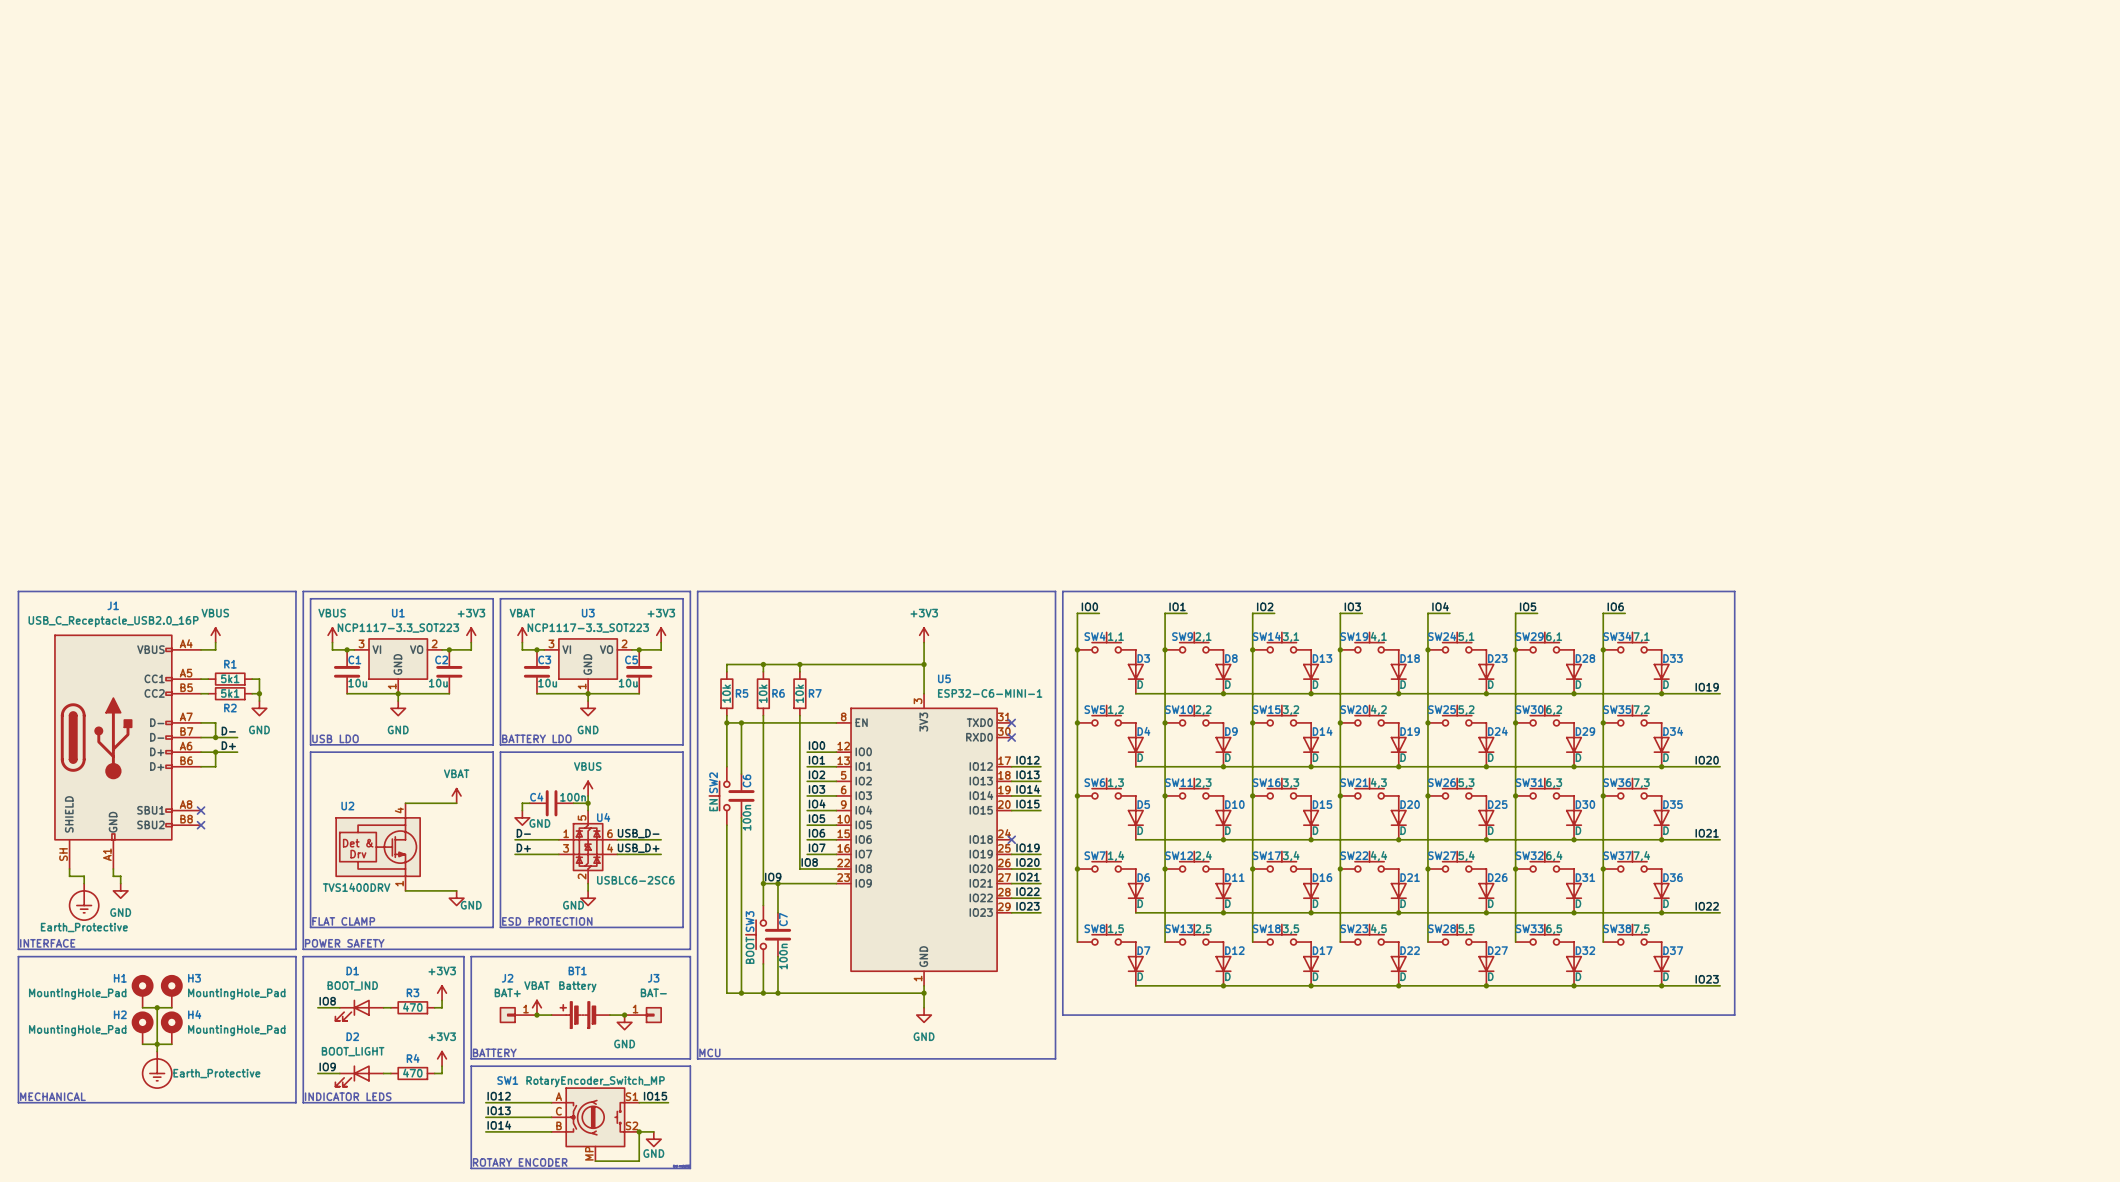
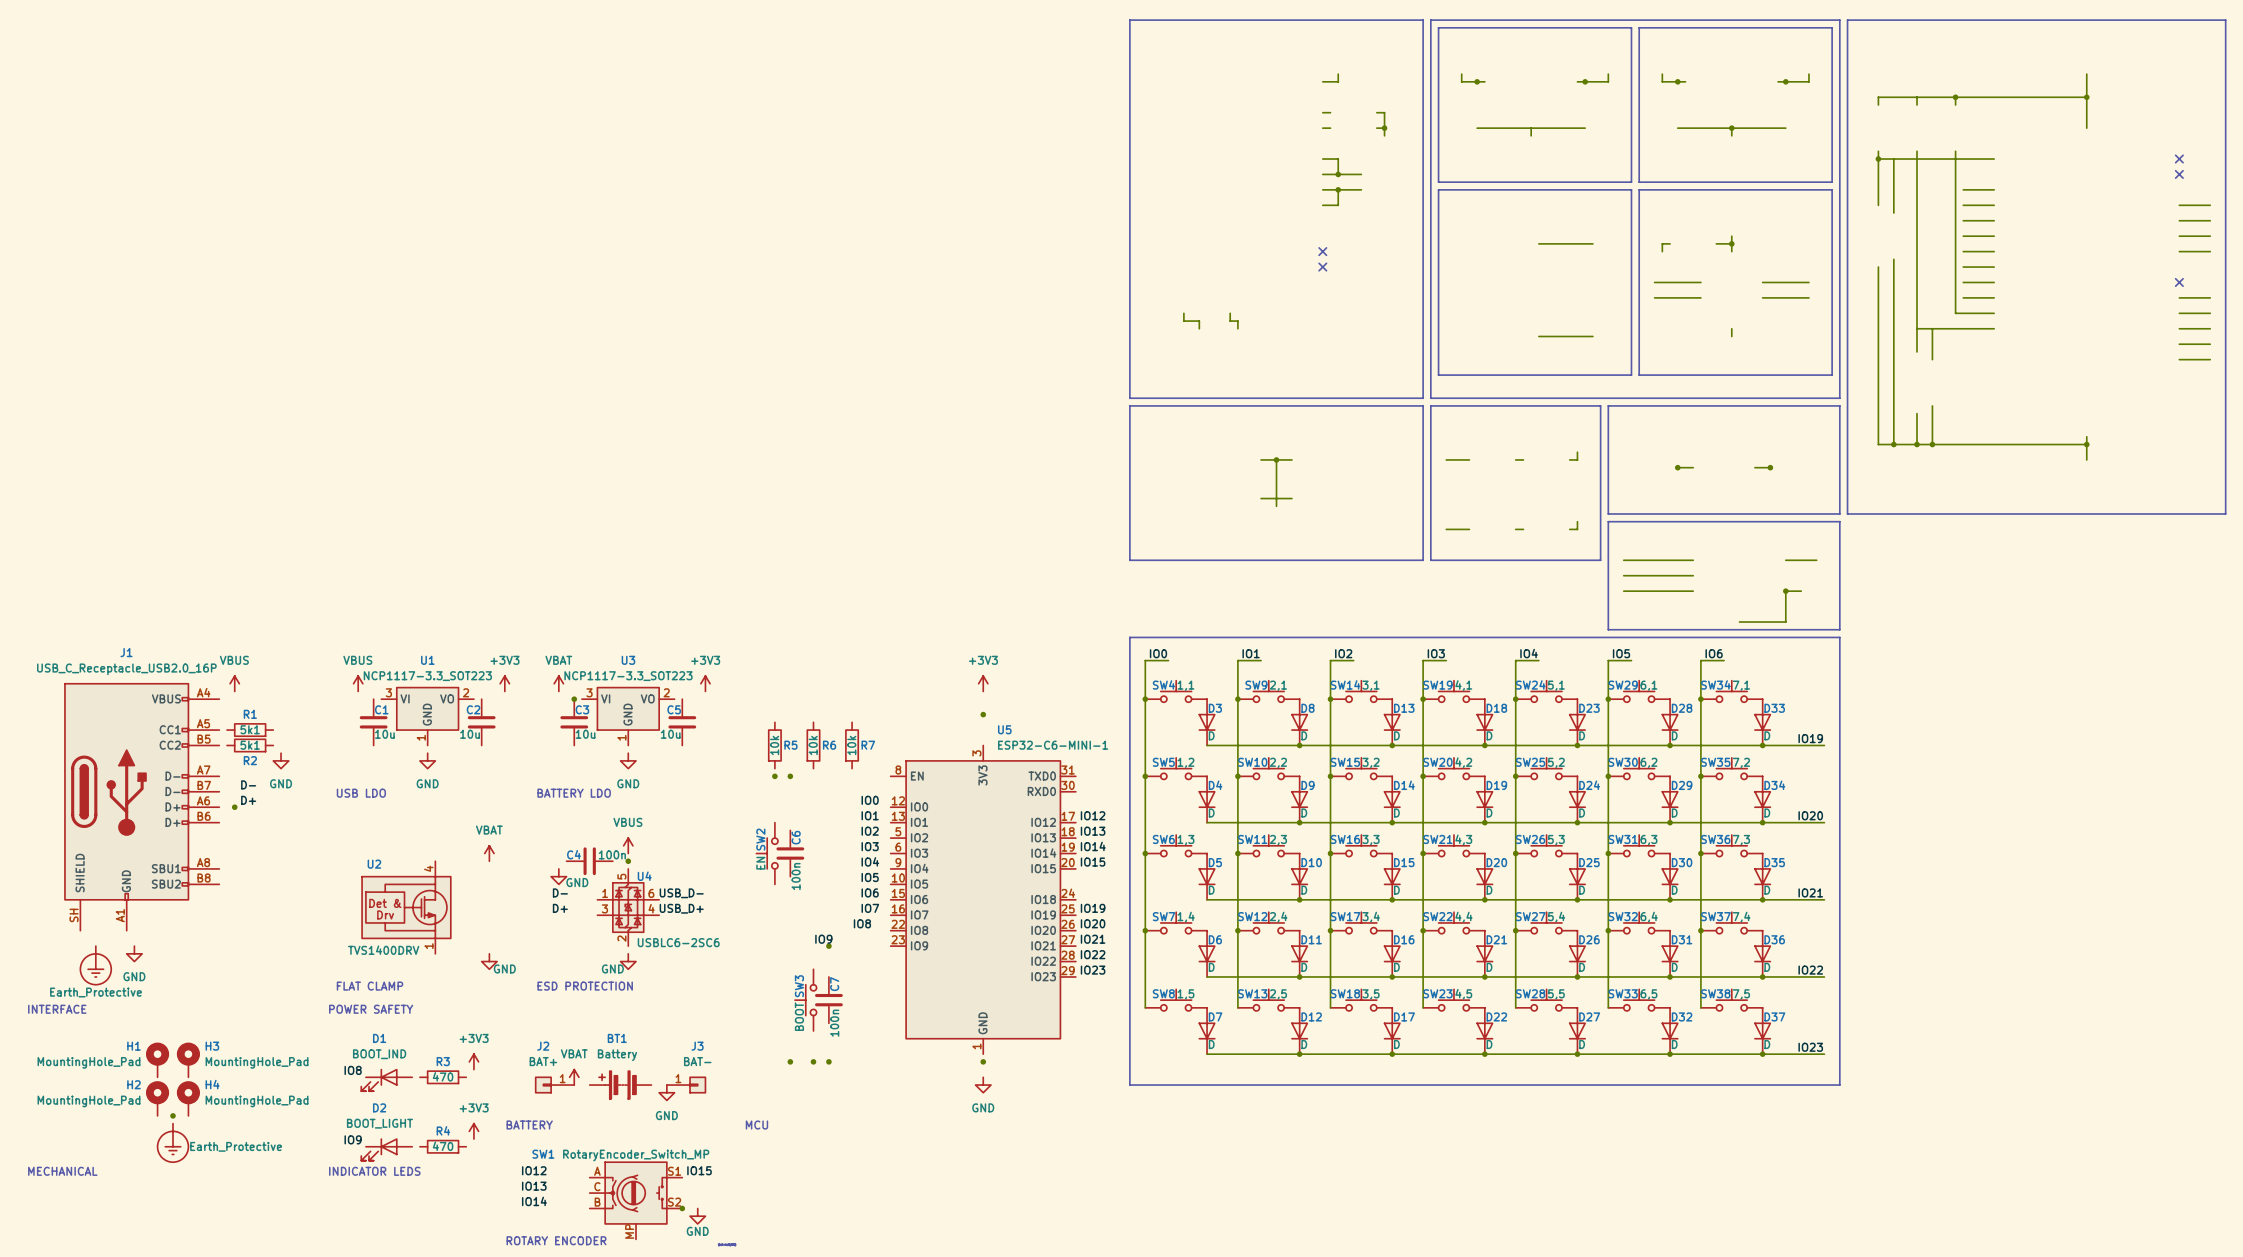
line: none -> (1129, 20) (1129, 398) (1423, 398) (1423, 20) (1129, 20)
line: none -> (1430, 20) (1430, 398) (1839, 398) (1839, 20) (1430, 20)
line: none -> (1847, 20) (2225, 20) (2225, 513) (1847, 513) (1847, 20)
line: none -> (1438, 27) (1631, 27) (1631, 182) (1438, 182) (1438, 27)
line: none -> (1639, 27) (1832, 27) (1832, 182) (1639, 182) (1639, 27)
wire: none -> (1338, 74) (1338, 81) (1322, 81)
wire: none -> (1461, 74) (1461, 81) (1484, 81)
wire: none -> (1608, 74) (1608, 81) (1577, 81)
wire: none -> (1662, 74) (1662, 81) (1685, 81)
wire: none -> (1808, 74) (1808, 81) (1778, 81)
wire: none -> (2086, 74) (2086, 128)
junction: none -> (1477, 81)
junction: none -> (1585, 81)
junction: none -> (1677, 81)
junction: none -> (1785, 81)
wire: none -> (1916, 97) (1916, 104)
wire: none -> (1955, 97) (1955, 104)
junction: none -> (1955, 97)
wire: none -> (2086, 97) (1878, 97) (1878, 104)
junction: none -> (2086, 97)
wire: none -> (1322, 112) (1330, 112)
wire: none -> (1376, 112) (1384, 112) (1384, 135)
wire: none -> (1322, 128) (1330, 128)
wire: none -> (1376, 128) (1384, 128)
junction: none -> (1384, 128)
wire: none -> (1477, 128) (1585, 128)
wire: none -> (1531, 128) (1531, 135)
wire: none -> (1677, 128) (1785, 128)
wire: none -> (1731, 128) (1731, 135)
junction: none -> (1731, 128)
wire: none -> (1878, 151) (1878, 205)
wire: none -> (1916, 151) (1916, 351)
wire: none -> (1955, 151) (1955, 313) (1994, 313)
wire: none -> (1322, 159) (1338, 159) (1338, 174)
wire: none -> (1878, 159) (1994, 159)
junction: none -> (1878, 159)
wire: none -> (1893, 159) (1893, 213)
no-connect mark: none -> (2179, 159)
wire: none -> (1322, 174) (1361, 174)
junction: none -> (1338, 174)
no-connect mark: none -> (2179, 174)
wire: none -> (1322, 189) (1361, 189)
wire: none -> (1338, 189) (1338, 205) (1322, 205)
junction: none -> (1338, 189)
line: none -> (1438, 189) (1438, 375) (1631, 375) (1631, 189) (1438, 189)
line: none -> (1639, 189) (1832, 189) (1832, 375) (1639, 375) (1639, 189)
wire: none -> (1963, 189) (1994, 189)
wire: none -> (1963, 205) (1994, 205)
wire: none -> (2179, 205) (2210, 205)
wire: none -> (1963, 220) (1994, 220)
wire: none -> (2179, 220) (2210, 220)
wire: none -> (1731, 236) (1731, 251)
wire: none -> (1963, 236) (1994, 236)
wire: none -> (2179, 236) (2210, 236)
wire: none -> (1538, 243) (1592, 243)
wire: none -> (1670, 243) (1662, 243) (1662, 251)
wire: none -> (1716, 243) (1731, 243)
junction: none -> (1731, 243)
no-connect mark: none -> (1322, 251)
wire: none -> (1963, 251) (1994, 251)
wire: none -> (2179, 251) (2210, 251)
wire: none -> (1893, 259) (1893, 444)
no-connect mark: none -> (1322, 267)
wire: none -> (1878, 267) (1878, 444) (2086, 444)
wire: none -> (1963, 267) (1994, 267)
wire: none -> (1654, 282) (1700, 282)
wire: none -> (1762, 282) (1808, 282)
wire: none -> (1963, 282) (1994, 282)
no-connect mark: none -> (2179, 282)
wire: none -> (1654, 297) (1700, 297)
wire: none -> (1762, 297) (1808, 297)
wire: none -> (1963, 297) (1994, 297)
wire: none -> (2179, 297) (2210, 297)
wire: none -> (1183, 313) (1183, 321) (1199, 321) (1199, 328)
wire: none -> (1230, 313) (1230, 321) (1237, 321) (1237, 328)
wire: none -> (2179, 313) (2210, 313)
wire: none -> (1731, 328) (1731, 336)
wire: none -> (1916, 328) (1994, 328)
wire: none -> (1932, 328) (1932, 359)
wire: none -> (2179, 328) (2210, 328)
wire: none -> (1538, 336) (1592, 336)
wire: none -> (2179, 344) (2210, 344)
wire: none -> (2179, 359) (2210, 359)
line: none -> (1129, 405) (1129, 560) (1423, 560) (1423, 405) (1129, 405)
line: none -> (1430, 405) (1600, 405) (1600, 560) (1430, 560) (1430, 405)
line: none -> (1608, 405) (1839, 405) (1839, 513) (1608, 513) (1608, 405)
wire: none -> (1932, 405) (1932, 444)
wire: none -> (1916, 413) (1916, 444)
wire: none -> (2086, 436) (2086, 459)
junction: none -> (1893, 444)
junction: none -> (1916, 444)
junction: none -> (1932, 444)
junction: none -> (2086, 444)
wire: none -> (1577, 452) (1577, 459) (1569, 459)
wire: none -> (1261, 459) (1291, 459)
wire: none -> (1276, 459) (1276, 506)
junction: none -> (1276, 459)
wire: none -> (1446, 459) (1469, 459)
wire: none -> (1515, 459) (1523, 459)
wire: none -> (1677, 467) (1693, 467)
junction: none -> (1677, 467)
wire: none -> (1754, 467) (1770, 467)
junction: none -> (1770, 467)
wire: none -> (1261, 498) (1291, 498)
wire: none -> (1577, 521) (1577, 529) (1569, 529)
line: none -> (1608, 521) (1839, 521) (1839, 629) (1608, 629) (1608, 521)
wire: none -> (1446, 529) (1469, 529)
wire: none -> (1515, 529) (1523, 529)
wire: none -> (1623, 560) (1693, 560)
wire: none -> (1785, 560) (1816, 560)
wire: none -> (1623, 575) (1693, 575)
wire: none -> (1623, 591) (1693, 591)
junction: none -> (1785, 591)
wire: none -> (1801, 591) (1785, 591) (1785, 622) (1739, 622)
line: (18, 591) (295, 591) (295, 949) (18, 949) (18, 591) -> none
line: (303, 591) (690, 591) (690, 949) (303, 949) (303, 591) -> none
line: (697, 591) (1055, 591) (1055, 1058) (697, 1058) (697, 591) -> none
line: (310, 598) (493, 598) (493, 744) (310, 744) (310, 598) -> none
line: (500, 598) (683, 598) (683, 744) (500, 744) (500, 598) -> none
wire: (215, 642) (215, 649) (201, 649) -> none
wire: (332, 642) (332, 649) (354, 649) -> none
wire: (471, 642) (471, 649) (442, 649) -> none
wire: (522, 642) (522, 649) (544, 649) -> none
wire: (661, 642) (661, 649) (631, 649) -> none
wire: (924, 642) (924, 693) -> none
junction: (347, 649) -> none
junction: (449, 649) -> none
junction: (639, 649) -> none
wire: (763, 664) (763, 671) -> none
junction: (763, 664) -> none
wire: (799, 664) (799, 671) -> none
junction: (799, 664) -> none
wire: (924, 664) (726, 664) (726, 671) -> none
wire: (201, 679) (208, 679) -> none
wire: (252, 679) (259, 679) (259, 701) -> none
wire: (201, 693) (208, 693) -> none
wire: (252, 693) (259, 693) -> none
junction: (259, 693) -> none
wire: (347, 693) (449, 693) -> none
wire: (398, 693) (398, 701) -> none
junction: (398, 693) -> none
wire: (536, 693) (639, 693) -> none
wire: (588, 693) (588, 701) -> none
junction: (588, 693) -> none
wire: (726, 715) (726, 766) -> none
wire: (763, 715) (763, 905) -> none
wire: (799, 715) (799, 869) (836, 869) -> none
wire: (201, 722) (215, 722) (215, 737) -> none
wire: (726, 722) (836, 722) -> none
wire: (741, 722) (741, 774) -> none
no-connect mark: (1011, 722) -> none
wire: (201, 737) (237, 737) -> none
junction: (215, 737) -> none
no-connect mark: (1011, 737) -> none
wire: (201, 752) (237, 752) -> none
wire: (215, 752) (215, 766) (201, 766) -> none
line: (310, 752) (310, 927) (493, 927) (493, 752) (310, 752) -> none
line: (500, 752) (683, 752) (683, 927) (500, 927) (500, 752) -> none
wire: (807, 752) (836, 752) -> none
wire: (807, 766) (836, 766) -> none
wire: (1011, 766) (1040, 766) -> none
wire: (807, 781) (836, 781) -> none
wire: (1011, 781) (1040, 781) -> none
wire: (588, 795) (588, 810) -> none
wire: (807, 795) (836, 795) -> none
wire: (1011, 795) (1040, 795) -> none
wire: (405, 803) (456, 803) -> none
wire: (529, 803) (522, 803) (522, 810) -> none
wire: (573, 803) (588, 803) -> none
no-connect mark: (201, 810) -> none
wire: (807, 810) (836, 810) -> none
wire: (1011, 810) (1040, 810) -> none
wire: (741, 817) (741, 993) -> none
no-connect mark: (201, 825) -> none
wire: (726, 825) (726, 993) (924, 993) -> none
wire: (807, 825) (836, 825) -> none
wire: (515, 839) (558, 839) -> none
wire: (617, 839) (661, 839) -> none
wire: (807, 839) (836, 839) -> none
no-connect mark: (1011, 839) -> none
wire: (515, 854) (558, 854) -> none
wire: (617, 854) (661, 854) -> none
wire: (807, 854) (836, 854) -> none
wire: (1011, 854) (1040, 854) -> none
wire: (69, 869) (69, 876) (84, 876) (84, 883) -> none
wire: (113, 869) (113, 876) (120, 876) (120, 883) -> none
wire: (1011, 869) (1040, 869) -> none
wire: (588, 883) (588, 890) -> none
wire: (763, 883) (836, 883) -> none
junction: (763, 883) -> none
wire: (777, 883) (777, 912) -> none
wire: (1011, 883) (1040, 883) -> none
wire: (405, 890) (456, 890) -> none
wire: (1011, 898) (1040, 898) -> none
wire: (1011, 912) (1040, 912) -> none
line: (18, 956) (295, 956) (295, 1102) (18, 1102) (18, 956) -> none
line: (303, 956) (463, 956) (463, 1102) (303, 1102) (303, 956) -> none
line: (471, 956) (690, 956) (690, 1058) (471, 1058) (471, 956) -> none
wire: (777, 956) (777, 993) -> none
wire: (763, 963) (763, 993) -> none
wire: (924, 985) (924, 1007) -> none
wire: (442, 1000) (442, 1007) (434, 1007) -> none
wire: (142, 1007) (171, 1007) -> none
wire: (157, 1007) (157, 1051) -> none
junction: (157, 1007) -> none
wire: (317, 1007) (339, 1007) -> none
wire: (383, 1007) (390, 1007) -> none
wire: (536, 1015) (551, 1015) -> none
junction: (536, 1015) -> none
wire: (610, 1015) (624, 1015) -> none
junction: (624, 1015) -> none
wire: (142, 1044) (171, 1044) -> none
wire: (442, 1066) (442, 1073) (434, 1073) -> none
line: (471, 1066) (690, 1066) (690, 1168) (471, 1168) (471, 1066) -> none
wire: (317, 1073) (339, 1073) -> none
wire: (383, 1073) (390, 1073) -> none
wire: (485, 1102) (551, 1102) -> none
wire: (639, 1102) (668, 1102) -> none
wire: (485, 1117) (551, 1117) -> none
wire: (485, 1131) (551, 1131) -> none
wire: (653, 1131) (639, 1131) (639, 1161) (595, 1161) -> none

